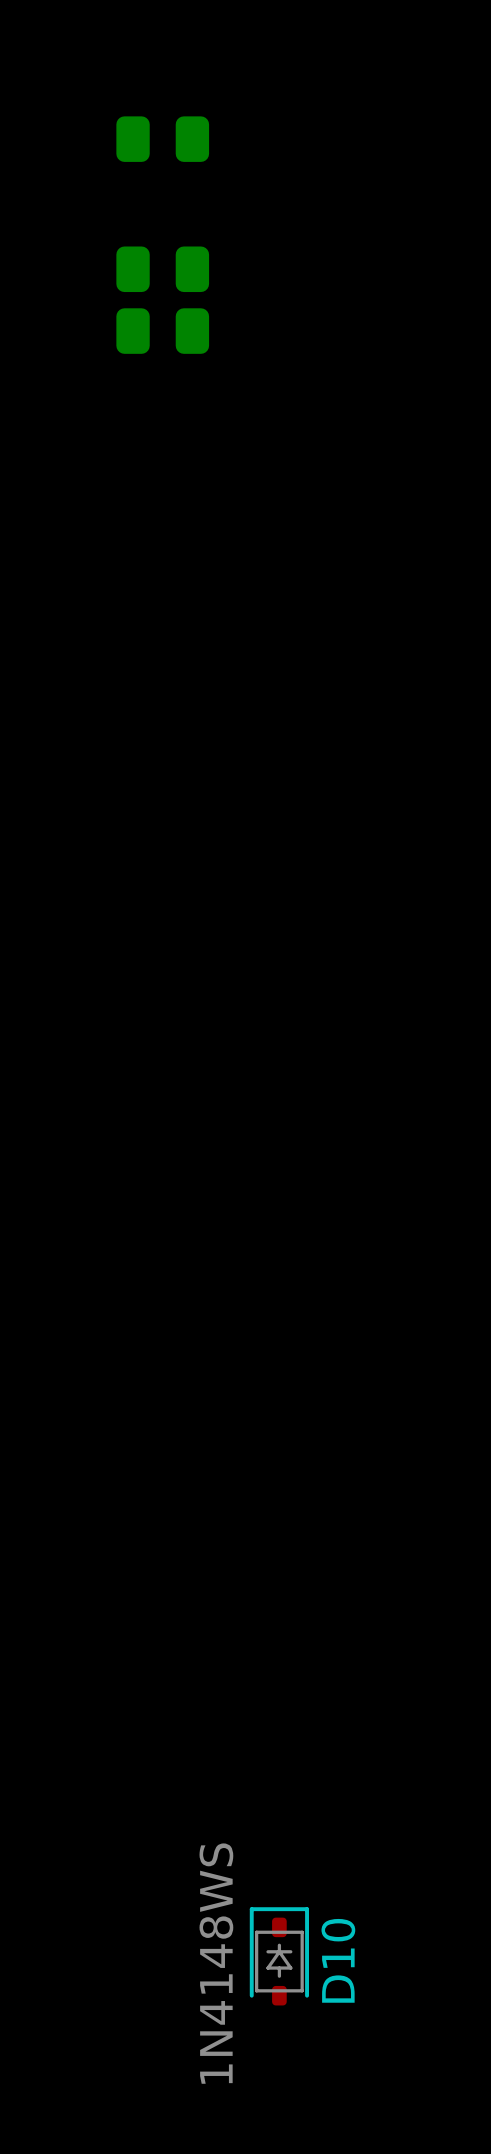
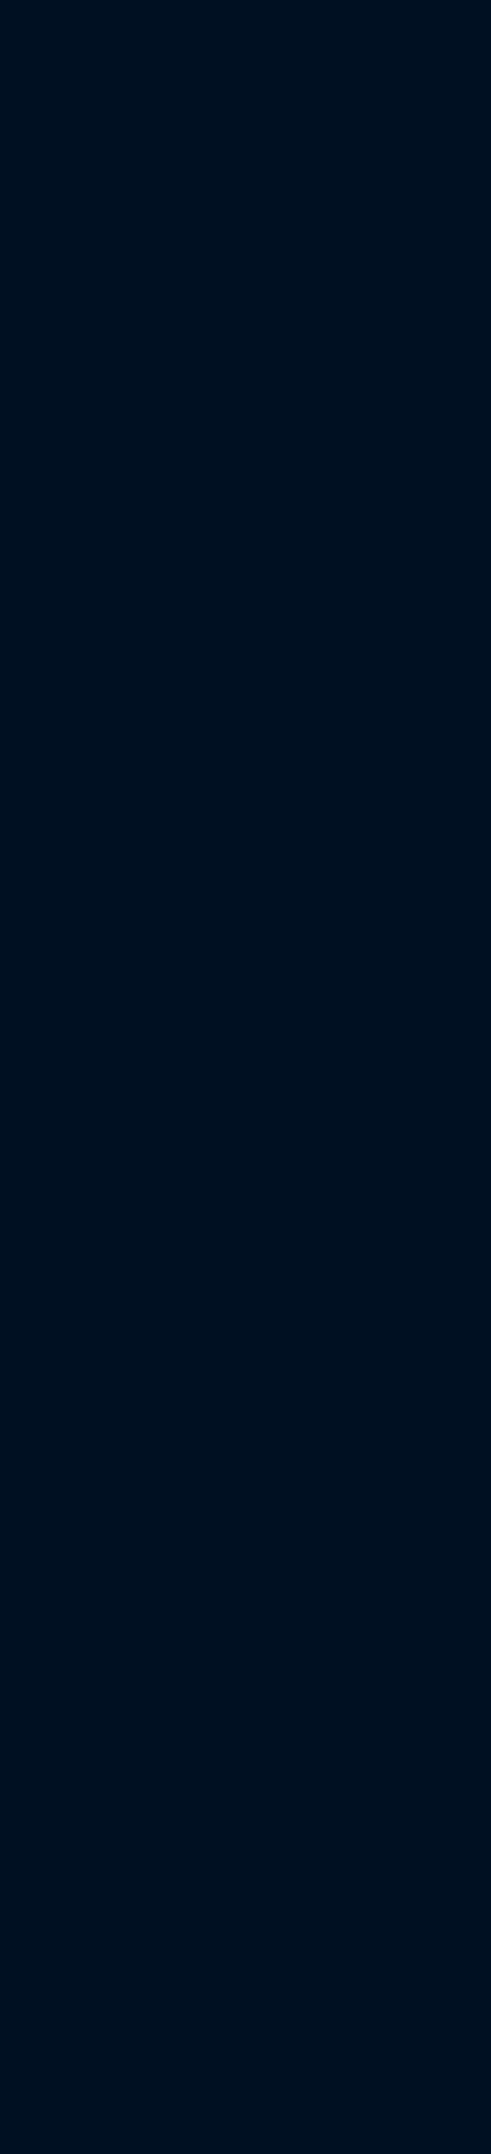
part: (162, 139) -> none
part: (162, 269) -> none
part: (162, 331) -> none
D10: 1N4148WS (279, 1956) -> none

